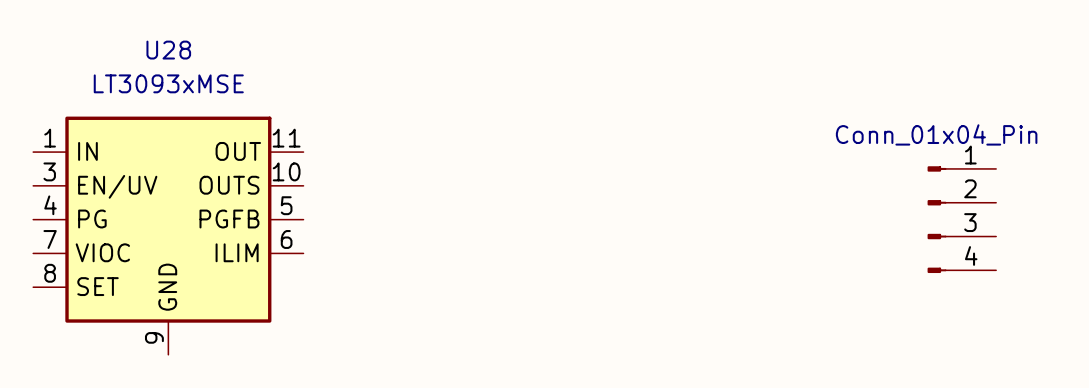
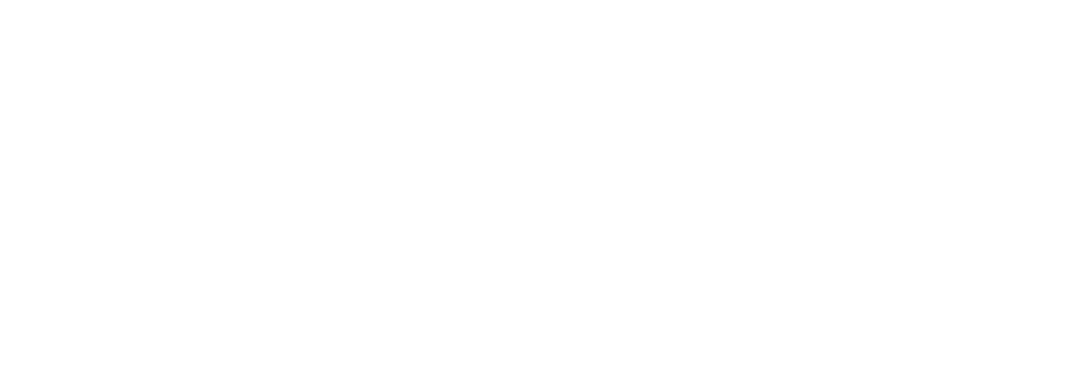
part: Conn_01x04_Pin (961, 219) -> none
U28: LT3093xMSE (168, 235) -> none

